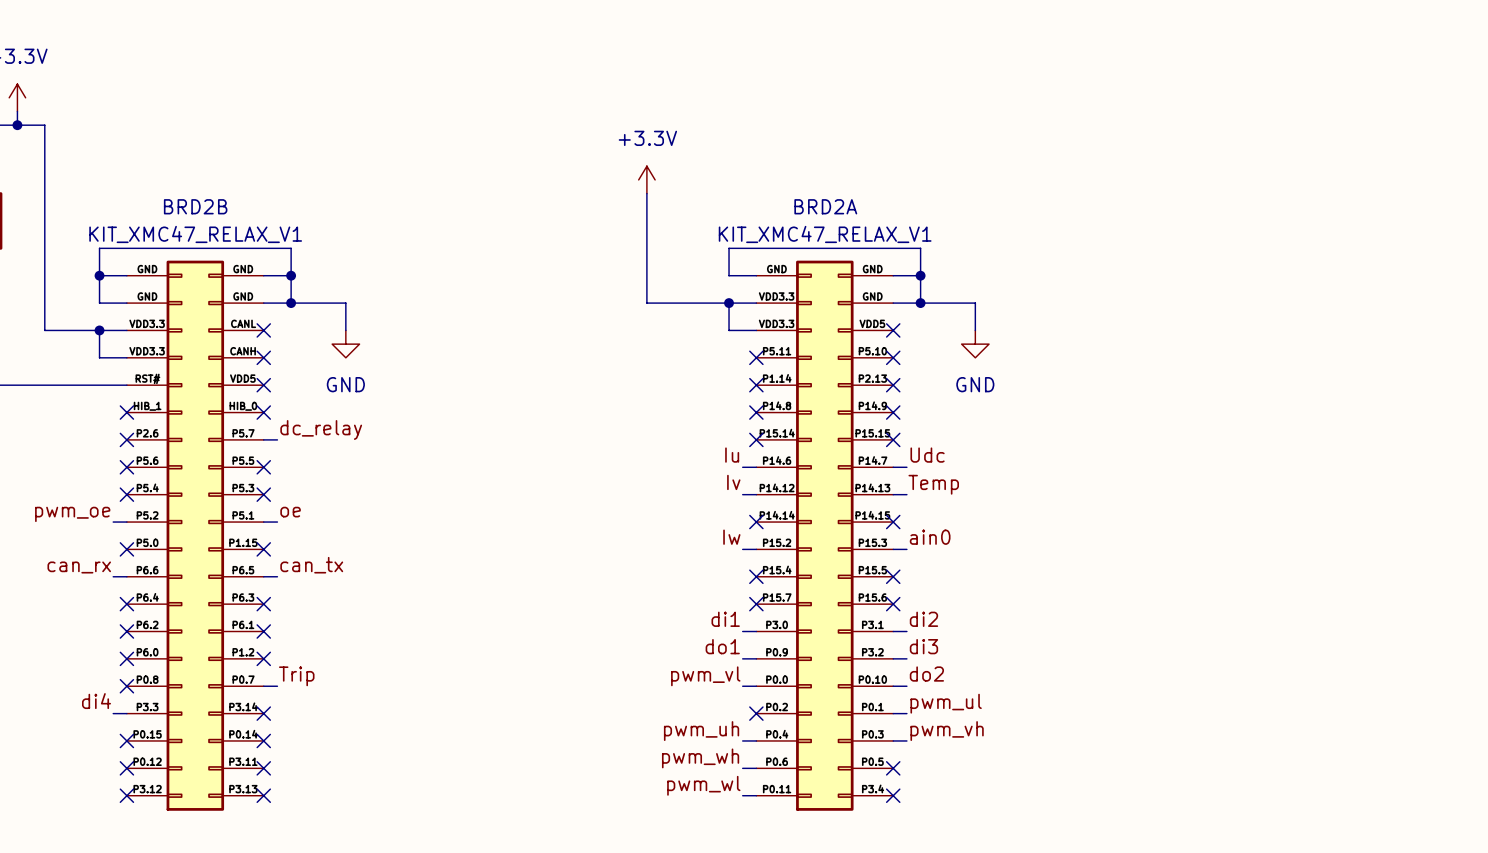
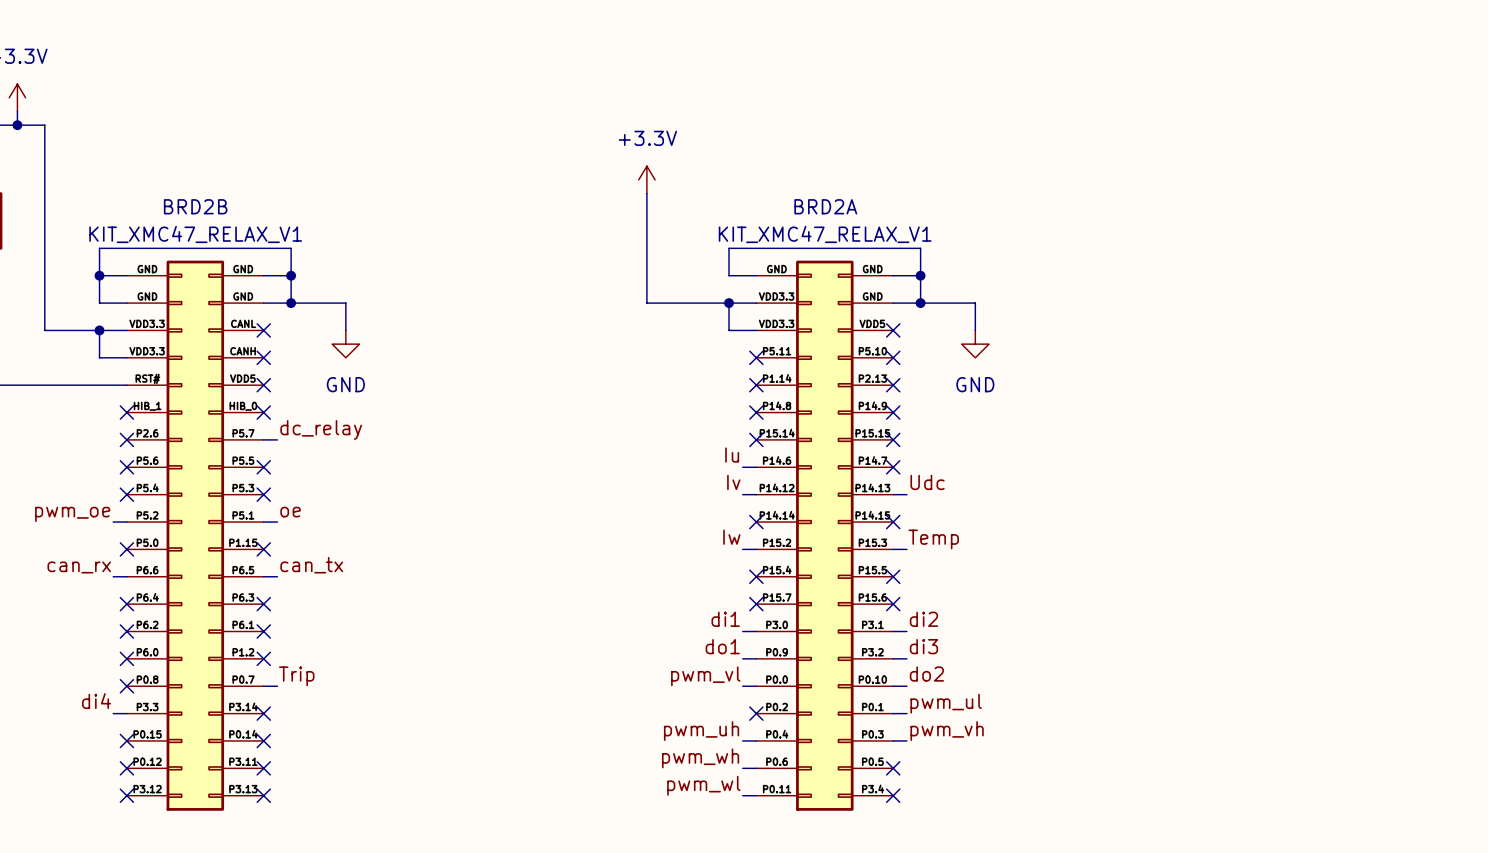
label: Udc (927, 455) -> none
wire: (893, 467) (906, 467) -> none
no-connect mark: none -> (893, 467)
label: Temp (933, 484) -> Udc (927, 482)
label: ain0 (930, 537) -> Temp (933, 539)

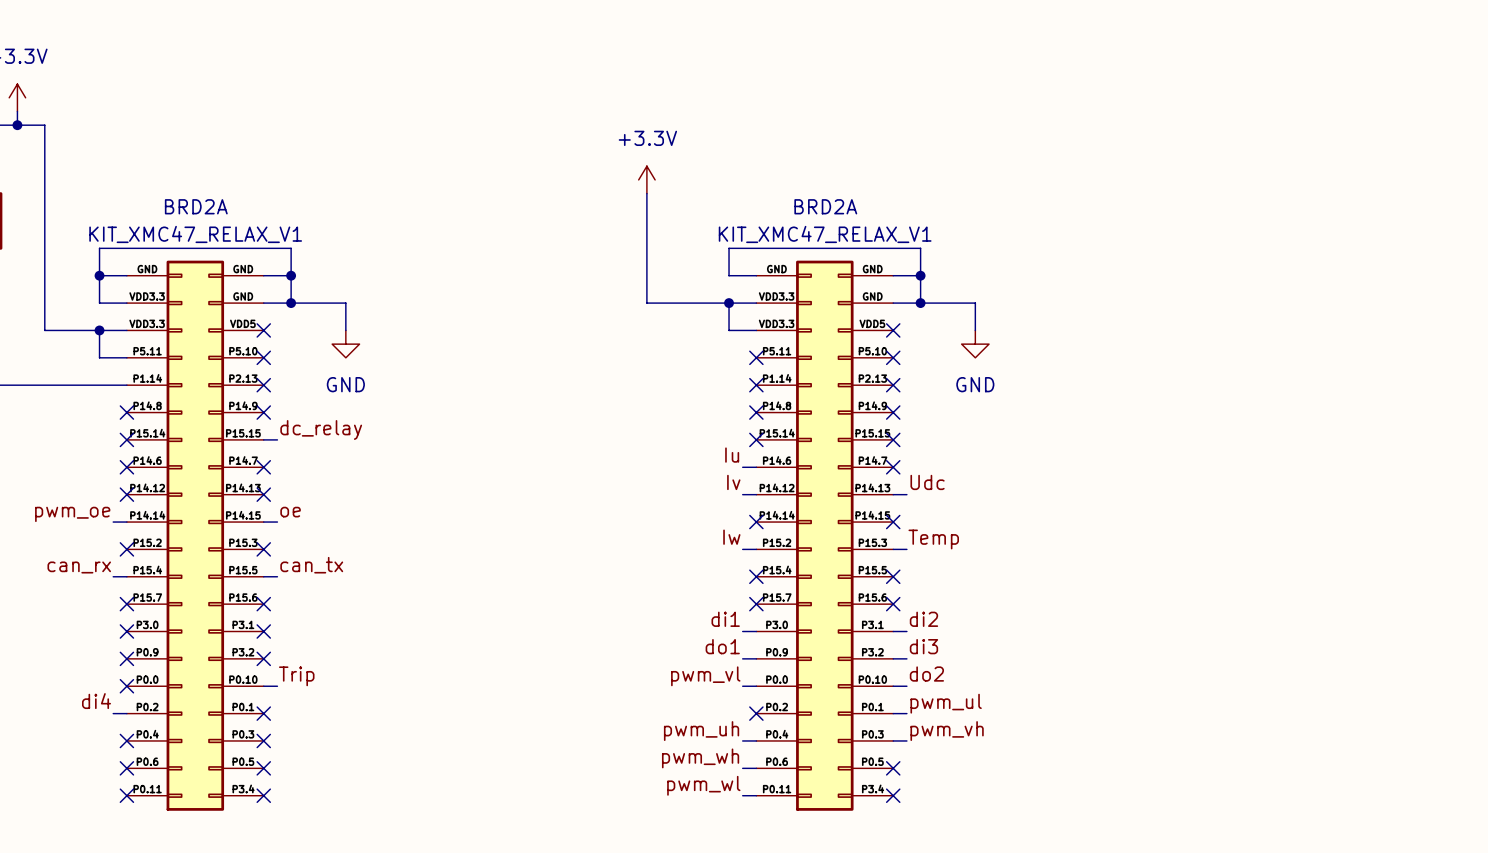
BRD2B name: BRD2B (195, 206) -> BRD2A (196, 206)
BRD2B symbol: [126, 260, 264, 811] -> [126, 260, 264, 811]

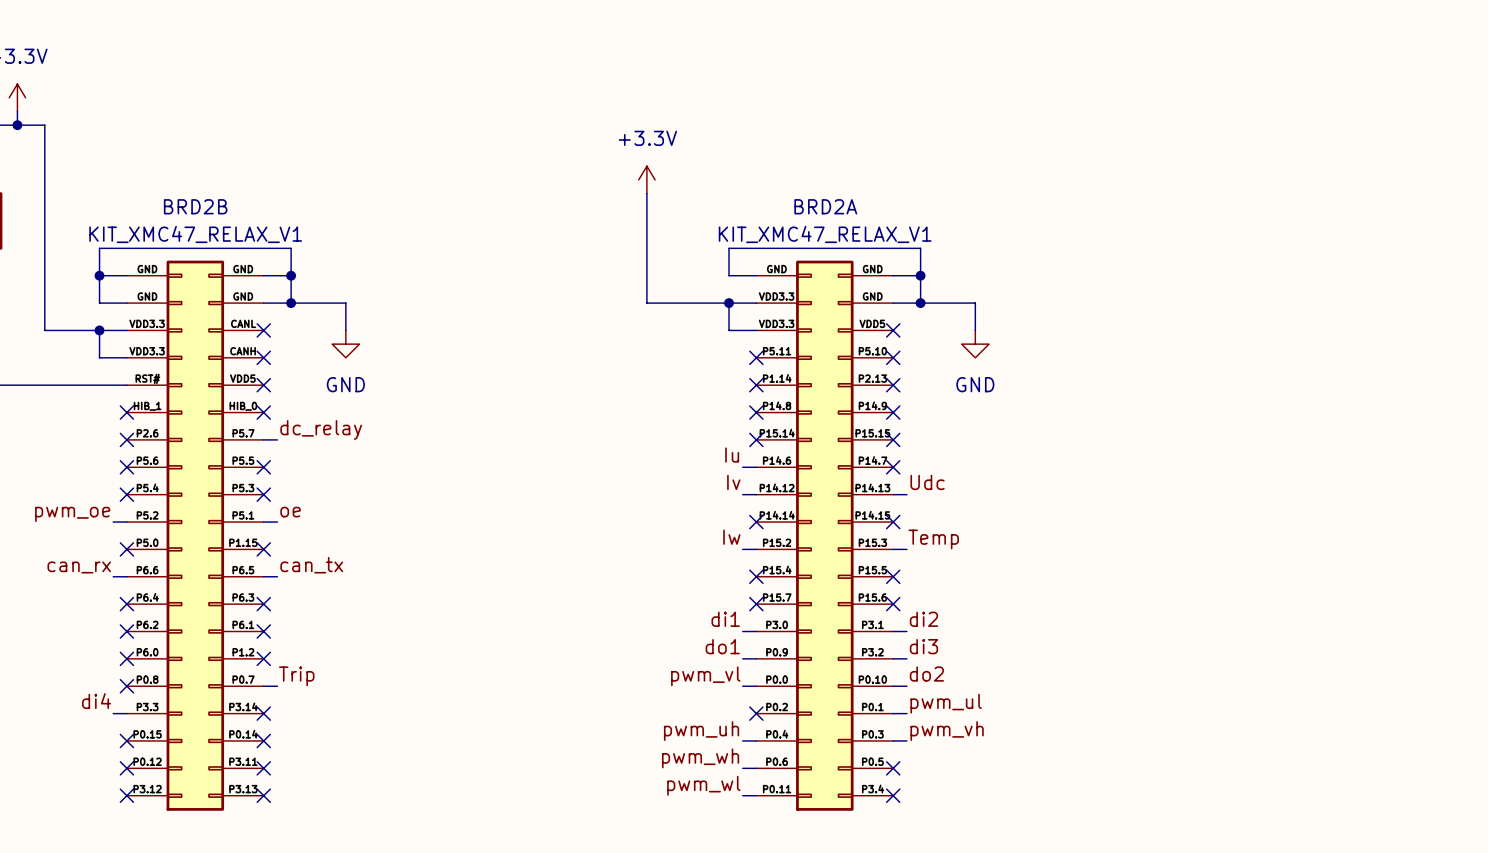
BRD2A name: BRD2A (196, 206) -> BRD2B (195, 206)
BRD2A symbol: [126, 260, 264, 811] -> [126, 260, 264, 811]

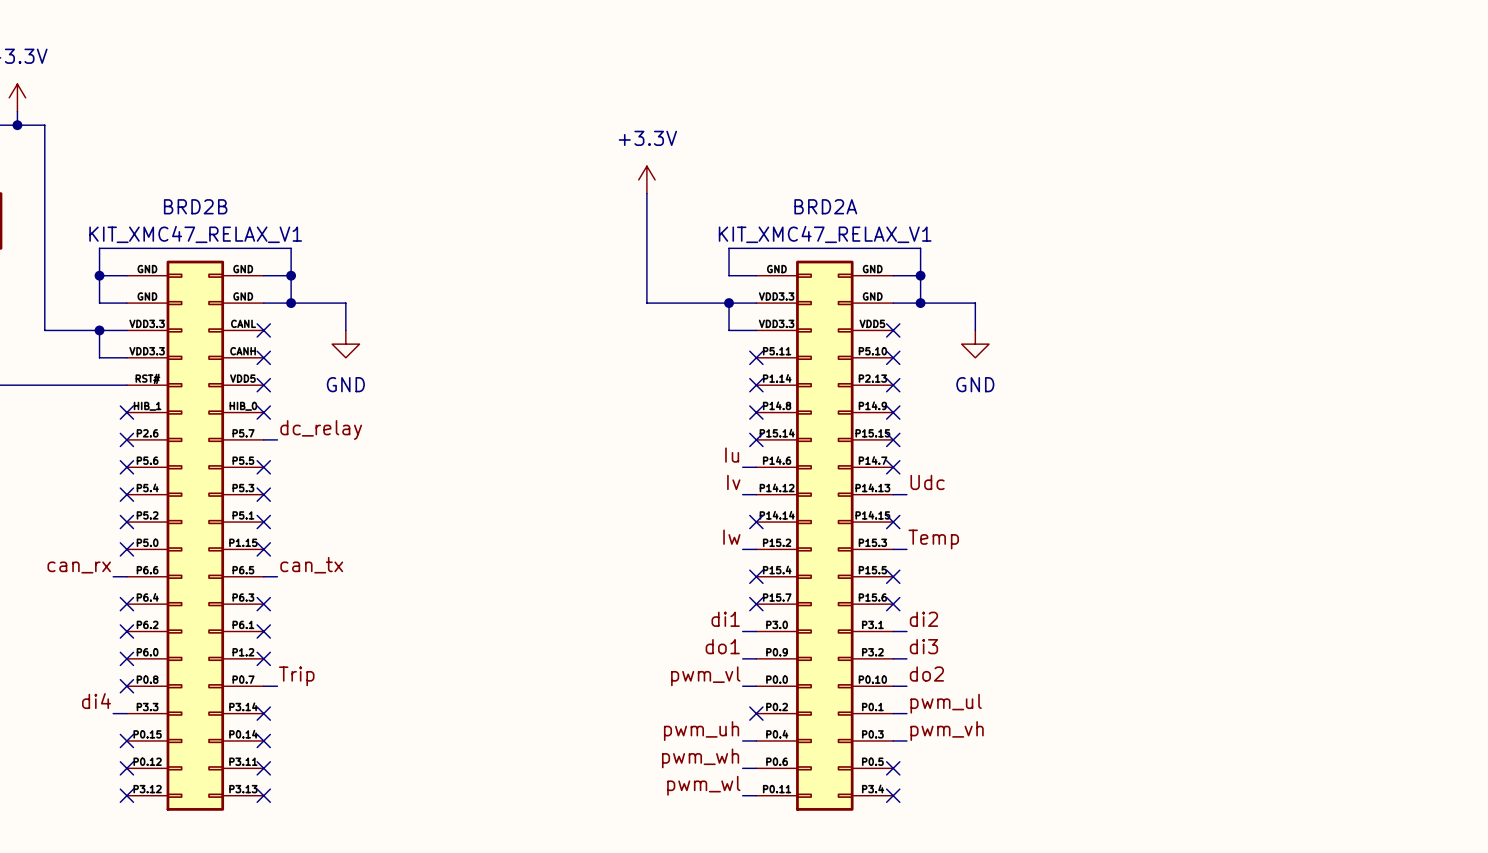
label: oe (290, 512) -> none
label: pwm_oe (72, 514) -> none
wire: (113, 522) (126, 522) -> none
no-connect mark: none -> (126, 522)
wire: (263, 522) (277, 522) -> none
no-connect mark: none -> (263, 522)

